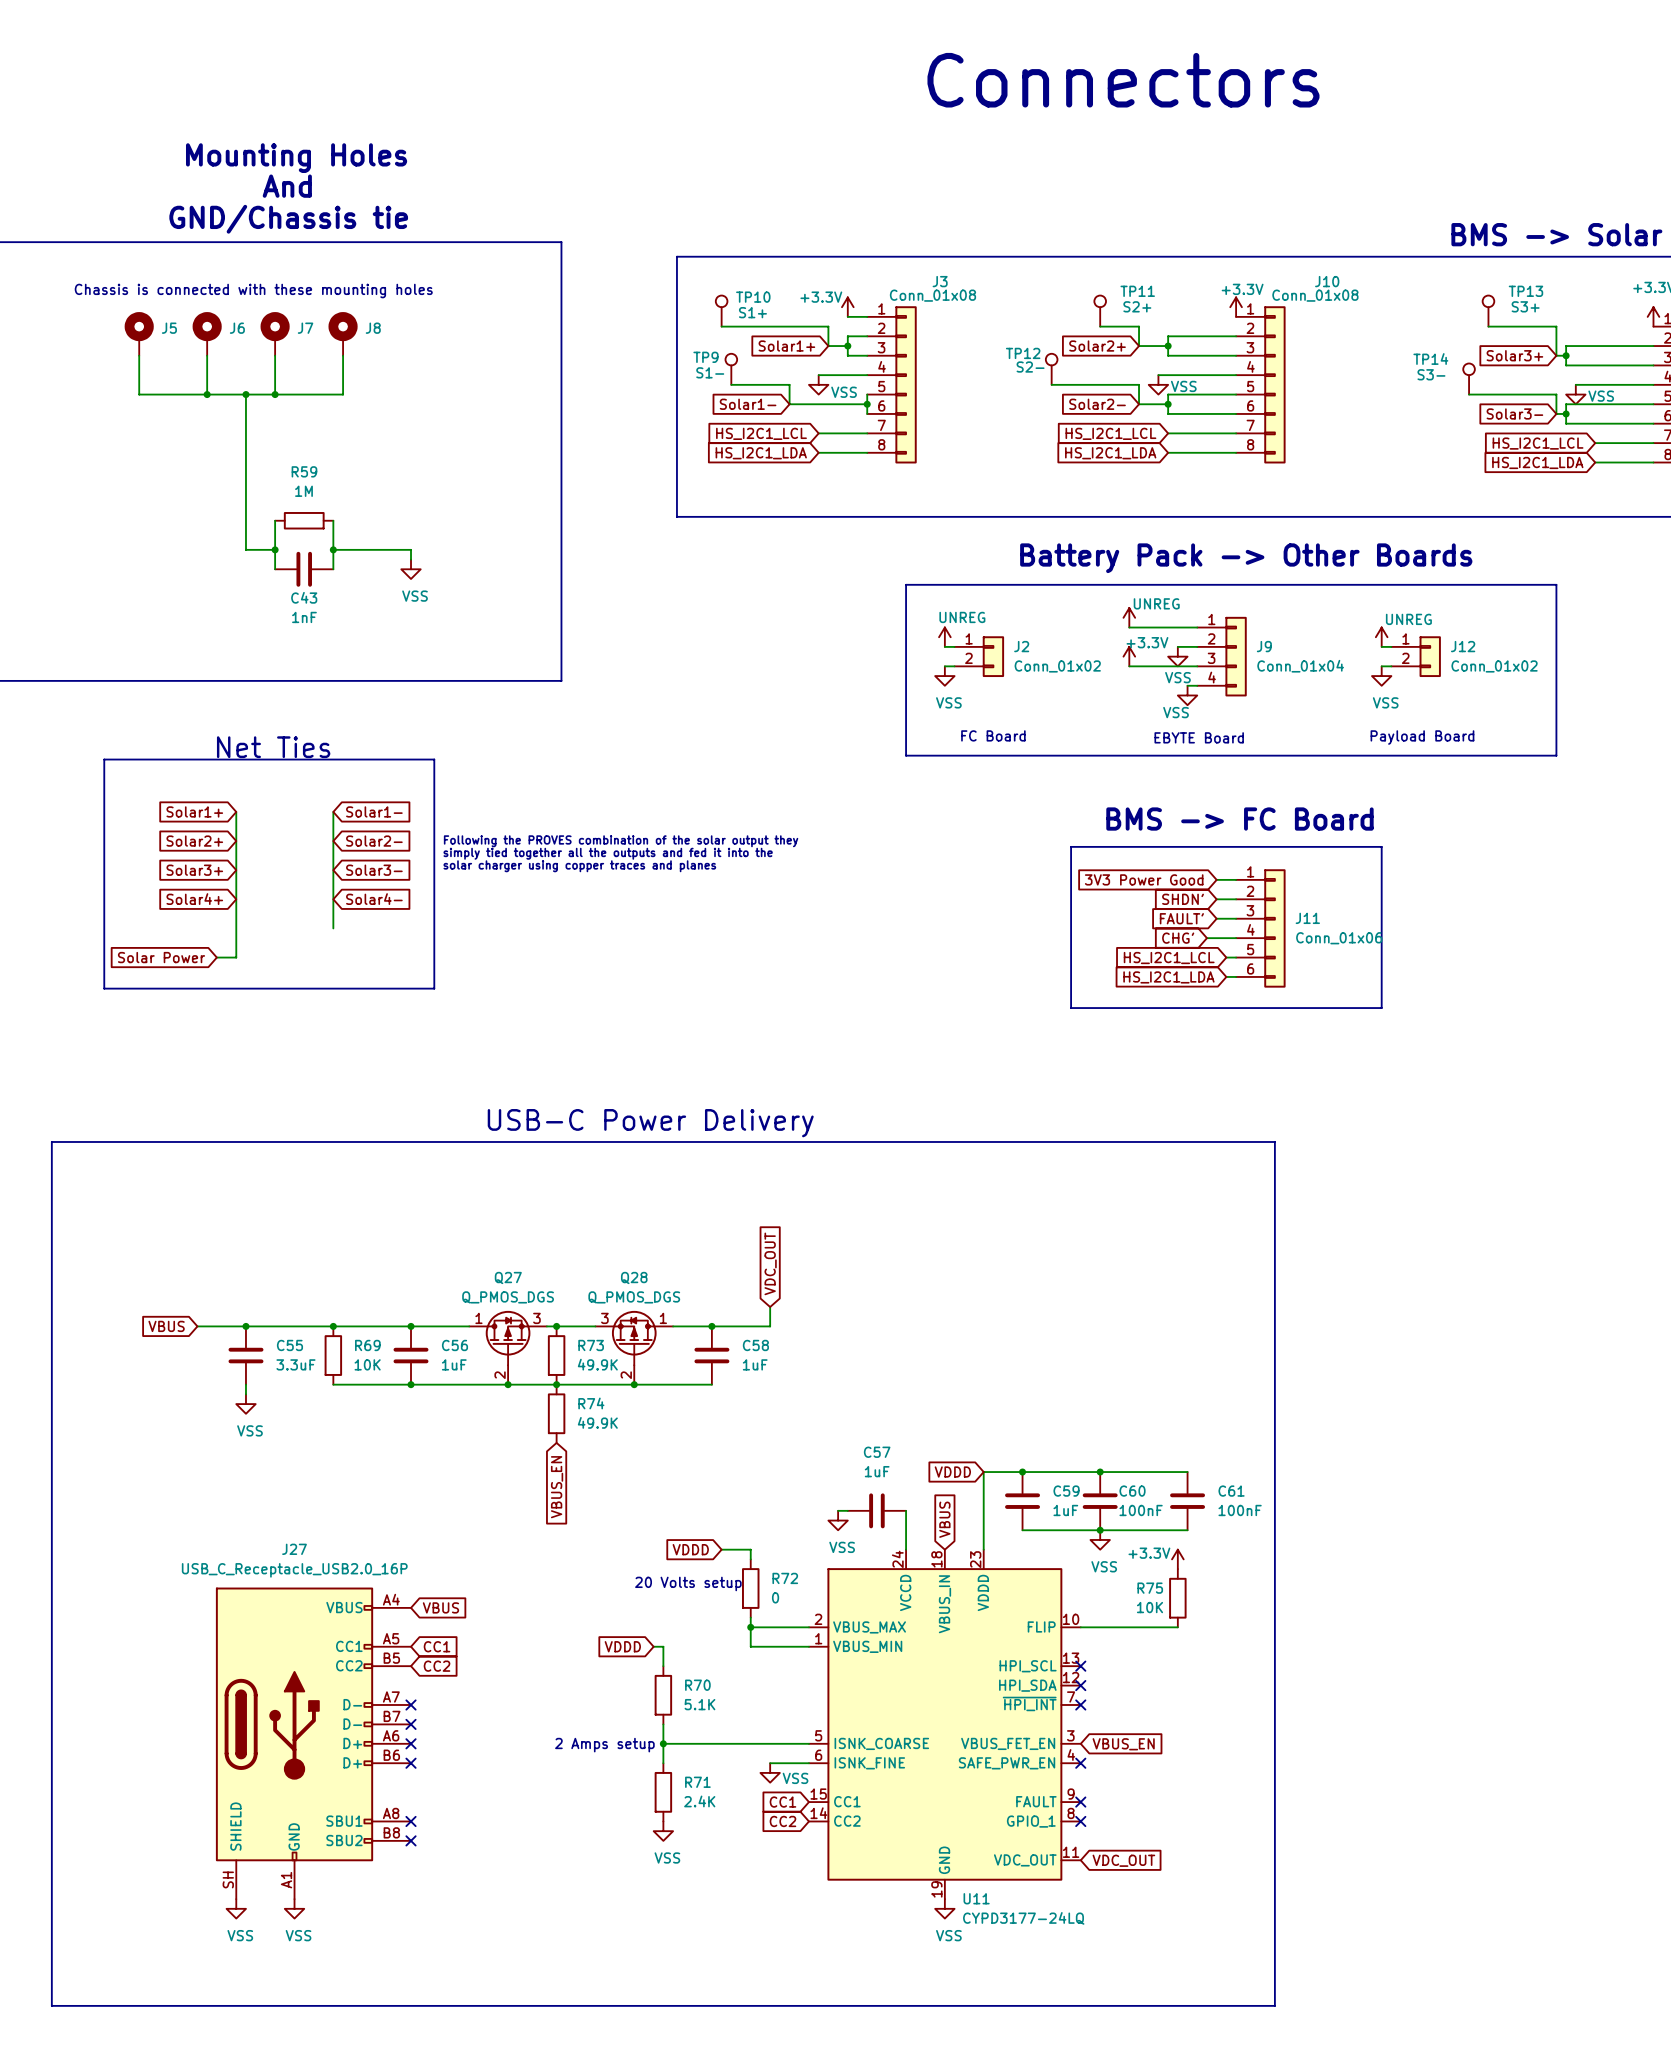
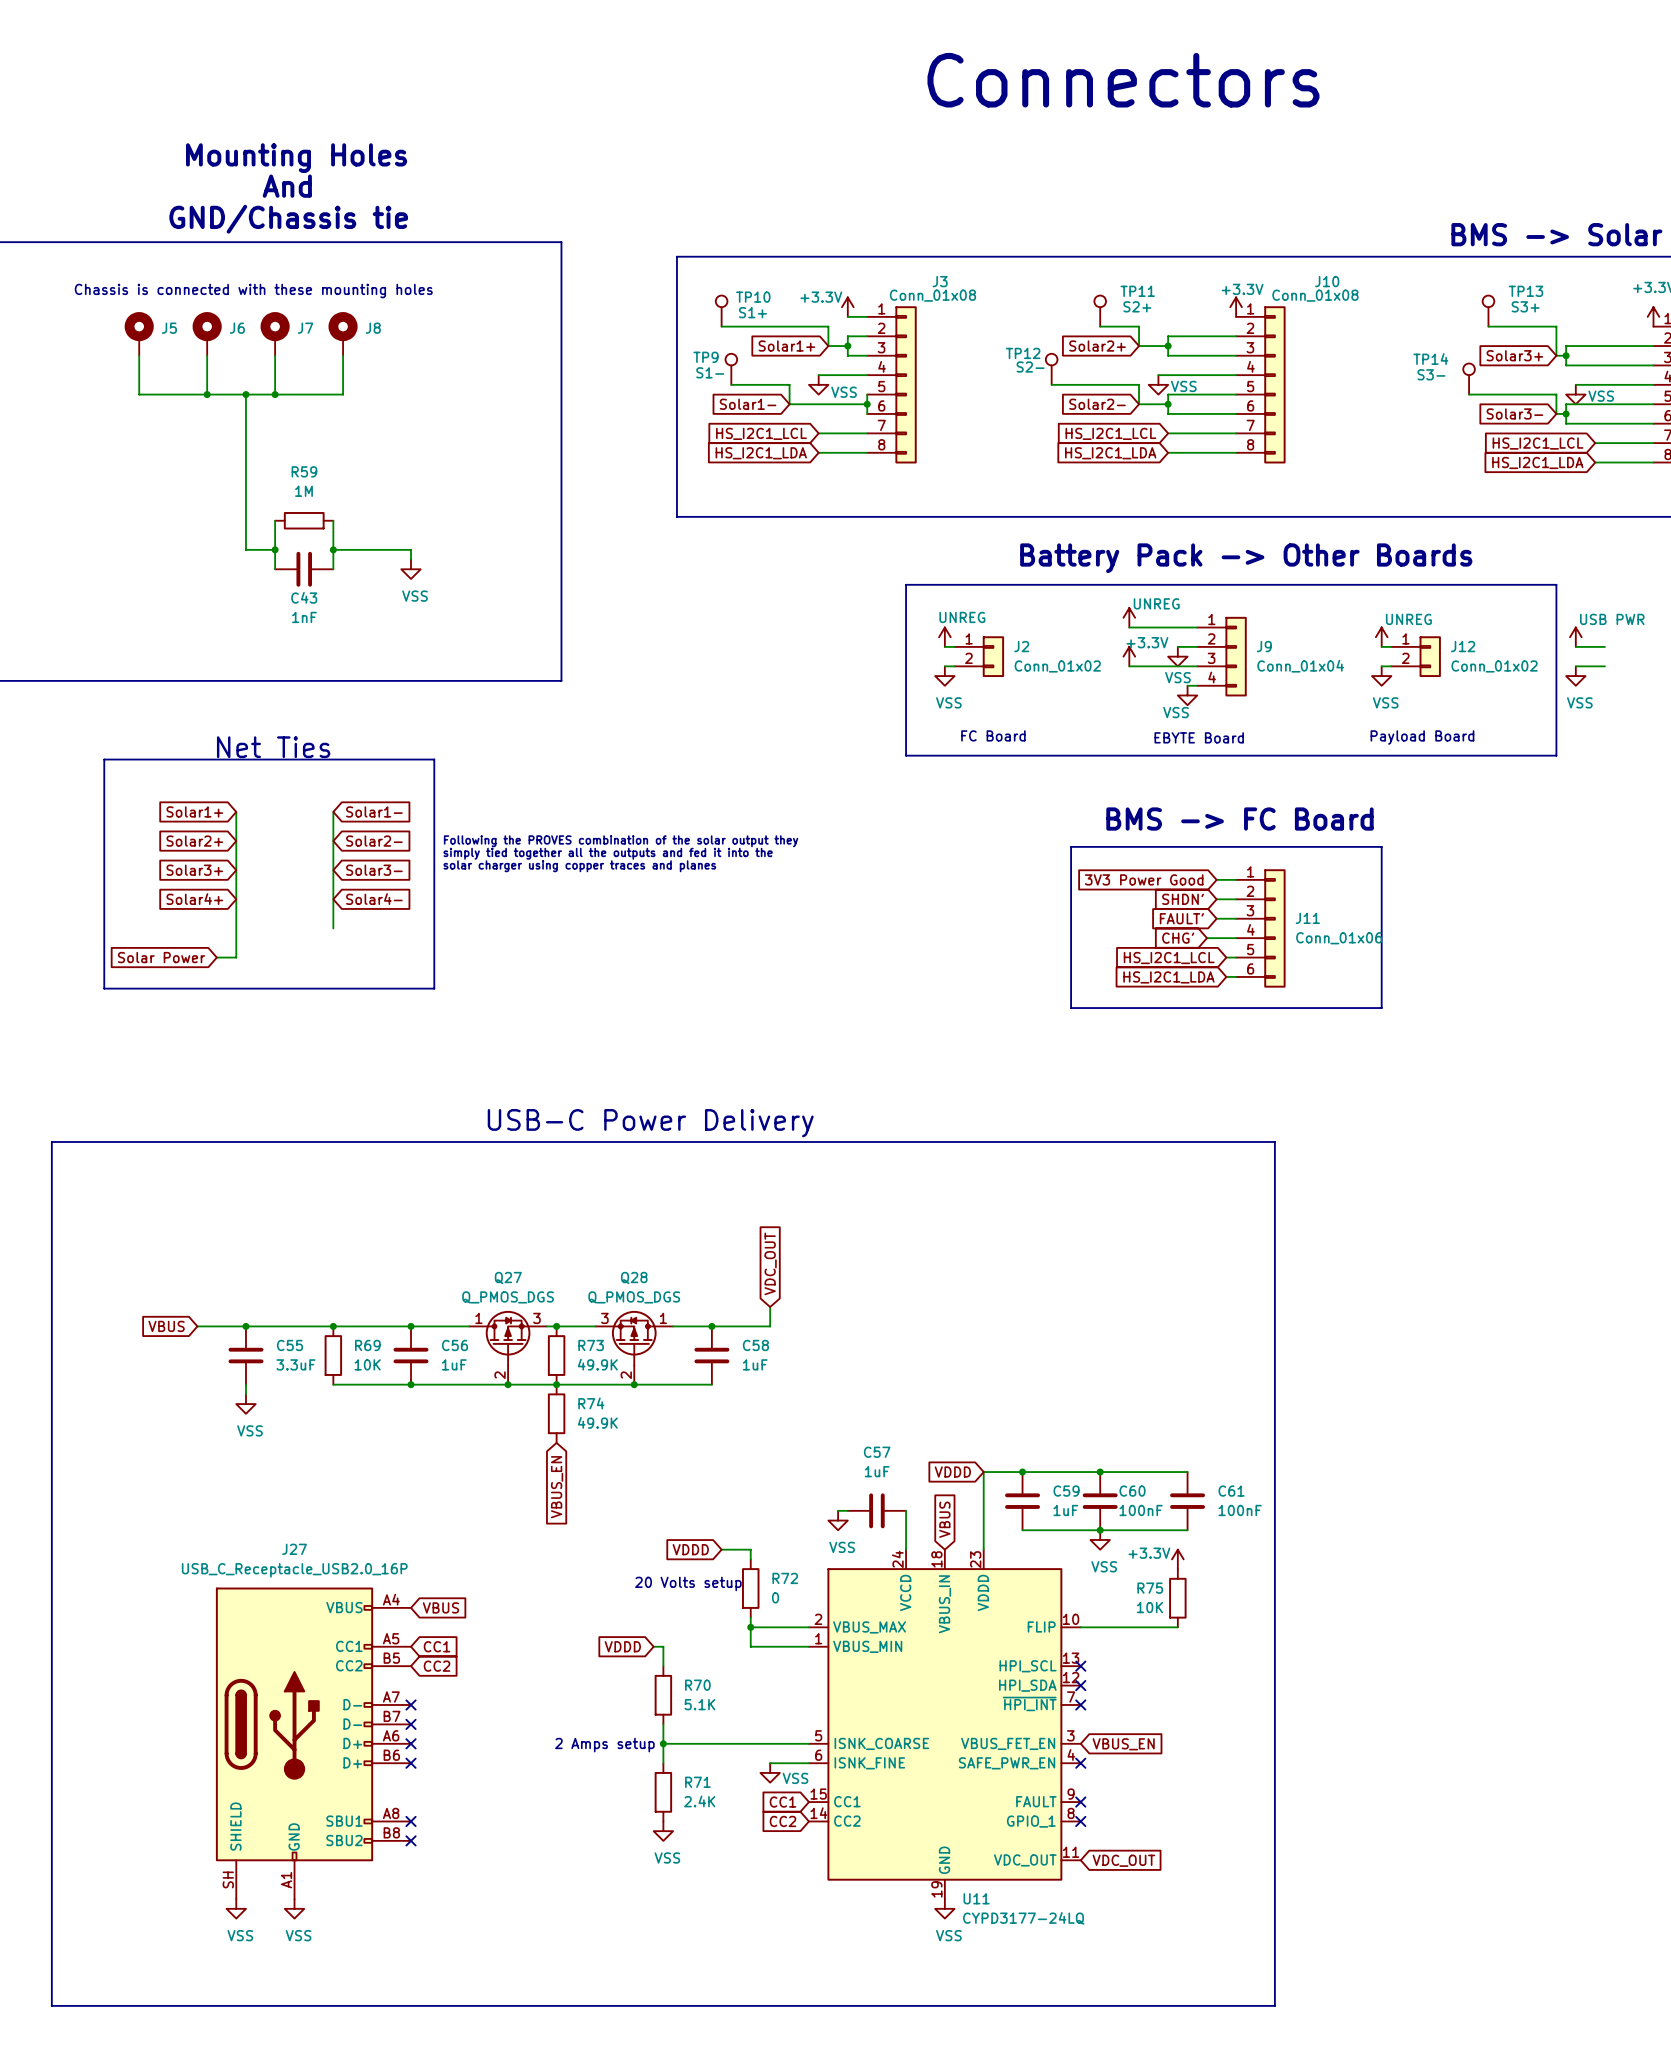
power symbol: none -> USB PWR (1575, 637)
wire: none -> (1575, 646) (1604, 646)
wire: none -> (1575, 666) (1604, 666)
power symbol: none -> VSS (1575, 676)

